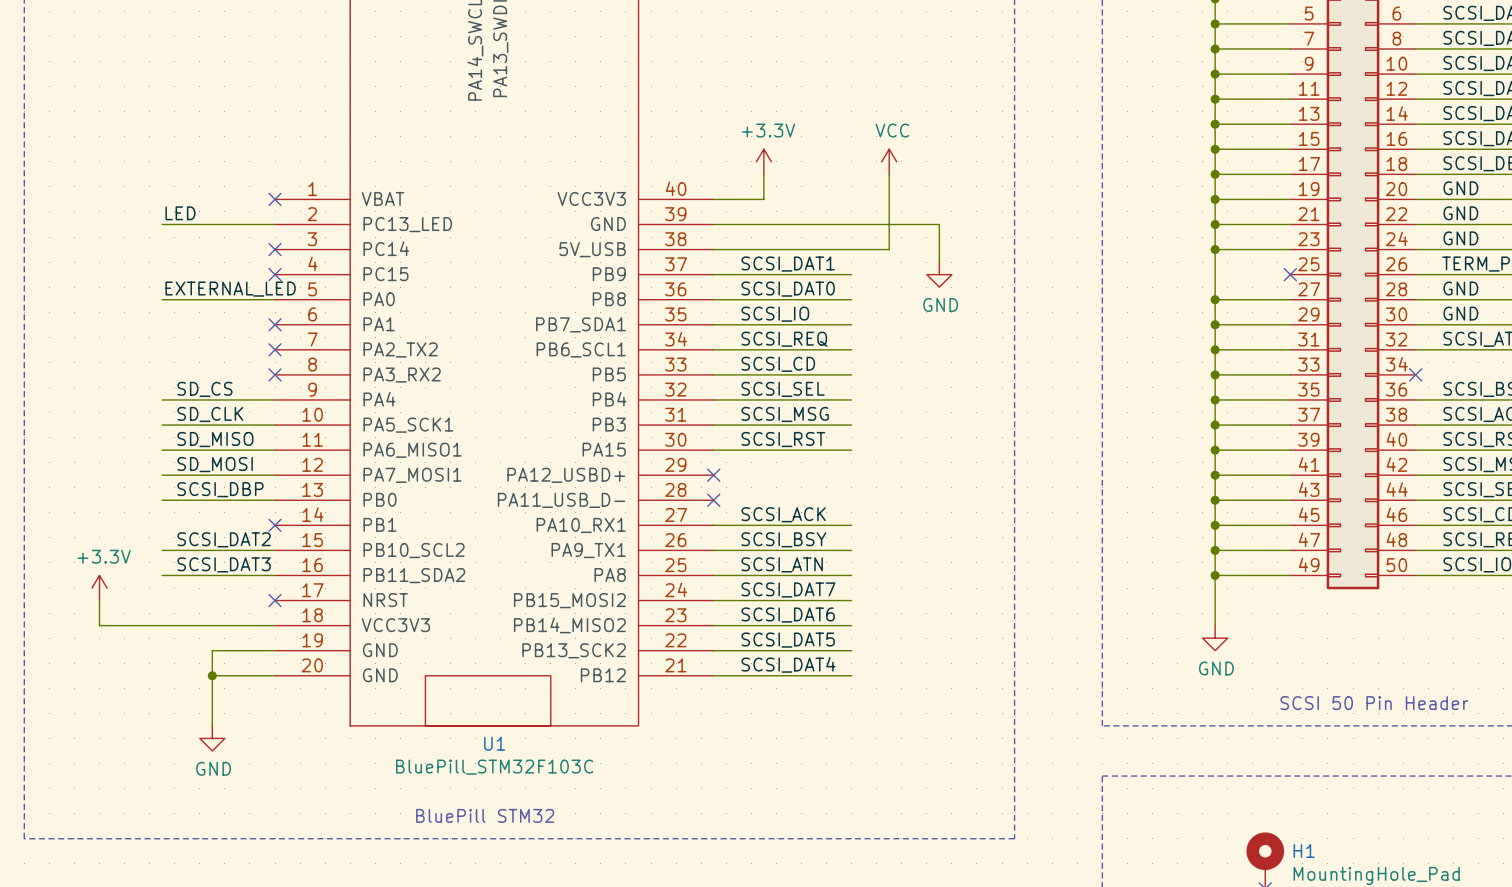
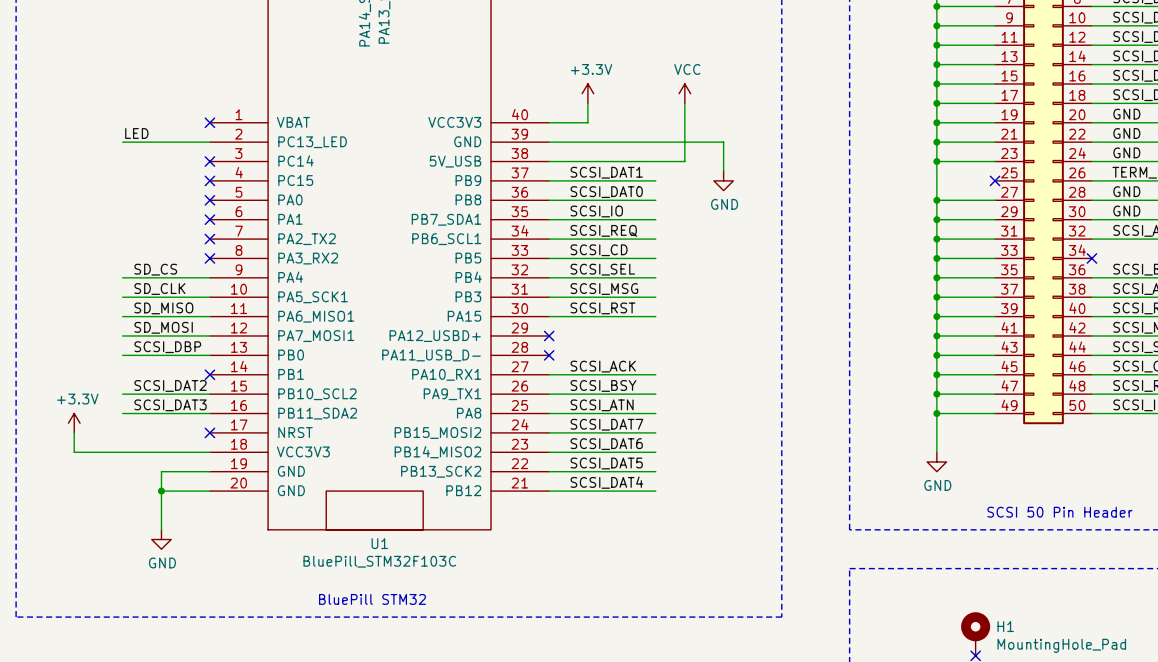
label: EXTERNAL_LED (230, 289) -> none
wire: (162, 299) (275, 299) -> none
no-connect mark: none -> (209, 200)

